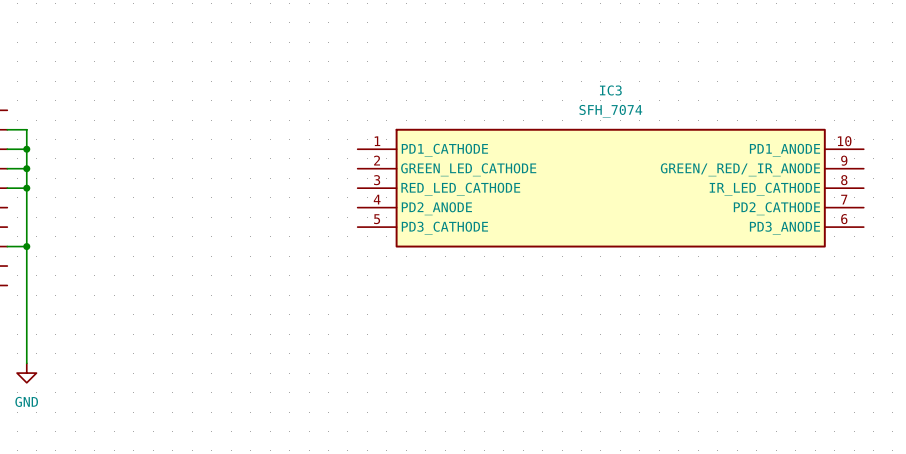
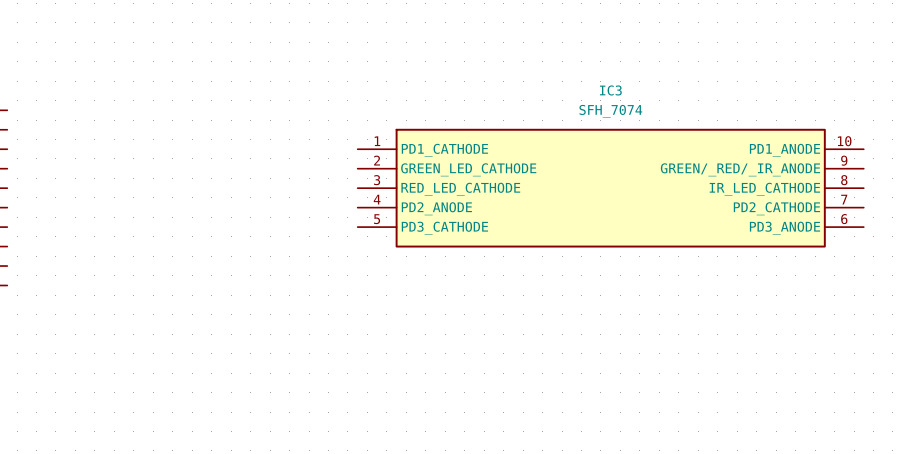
wire: (7, 129) (26, 129) (26, 363) -> none
wire: (7, 149) (26, 149) -> none
junction: (26, 149) -> none
wire: (7, 168) (26, 168) -> none
junction: (26, 168) -> none
wire: (7, 188) (26, 188) -> none
junction: (26, 188) -> none
wire: (7, 246) (26, 246) -> none
junction: (26, 246) -> none
power symbol: GND (26, 373) -> none

